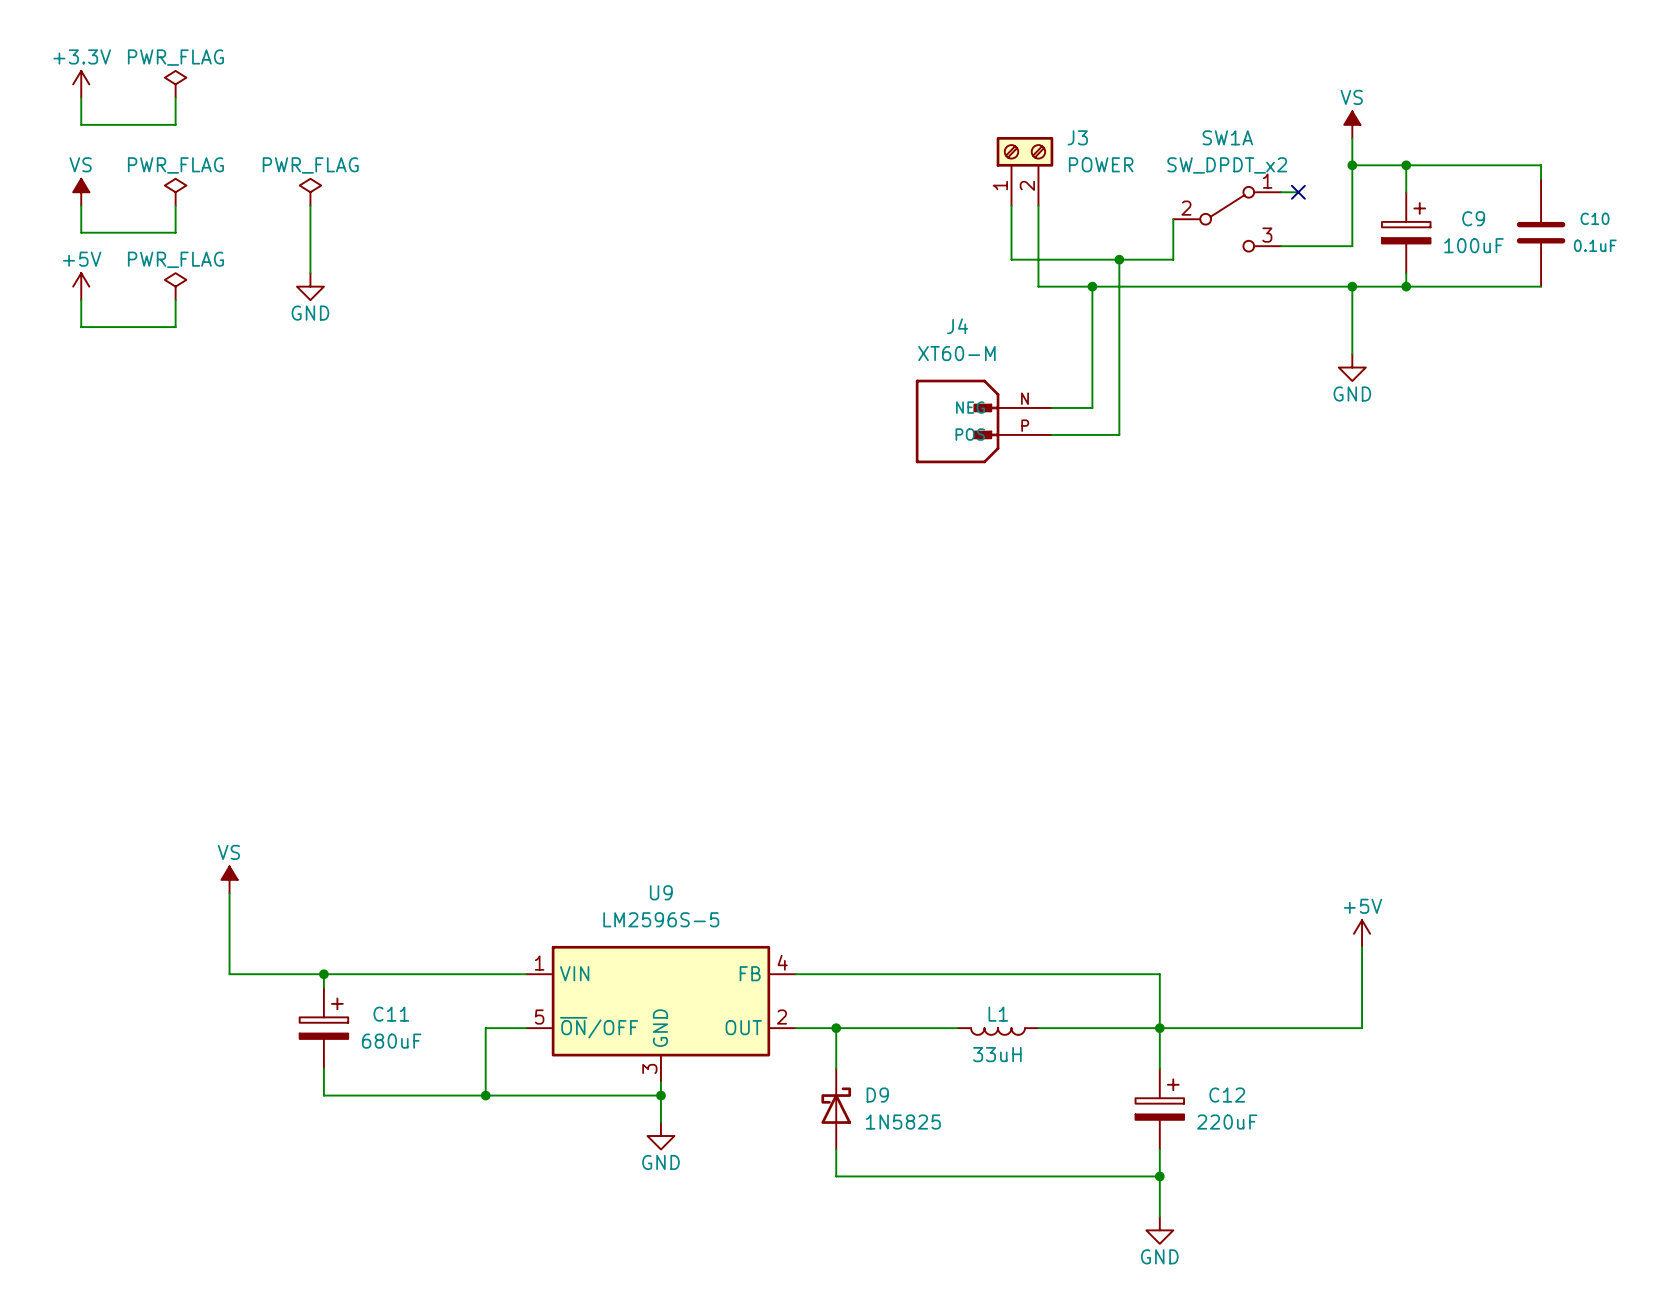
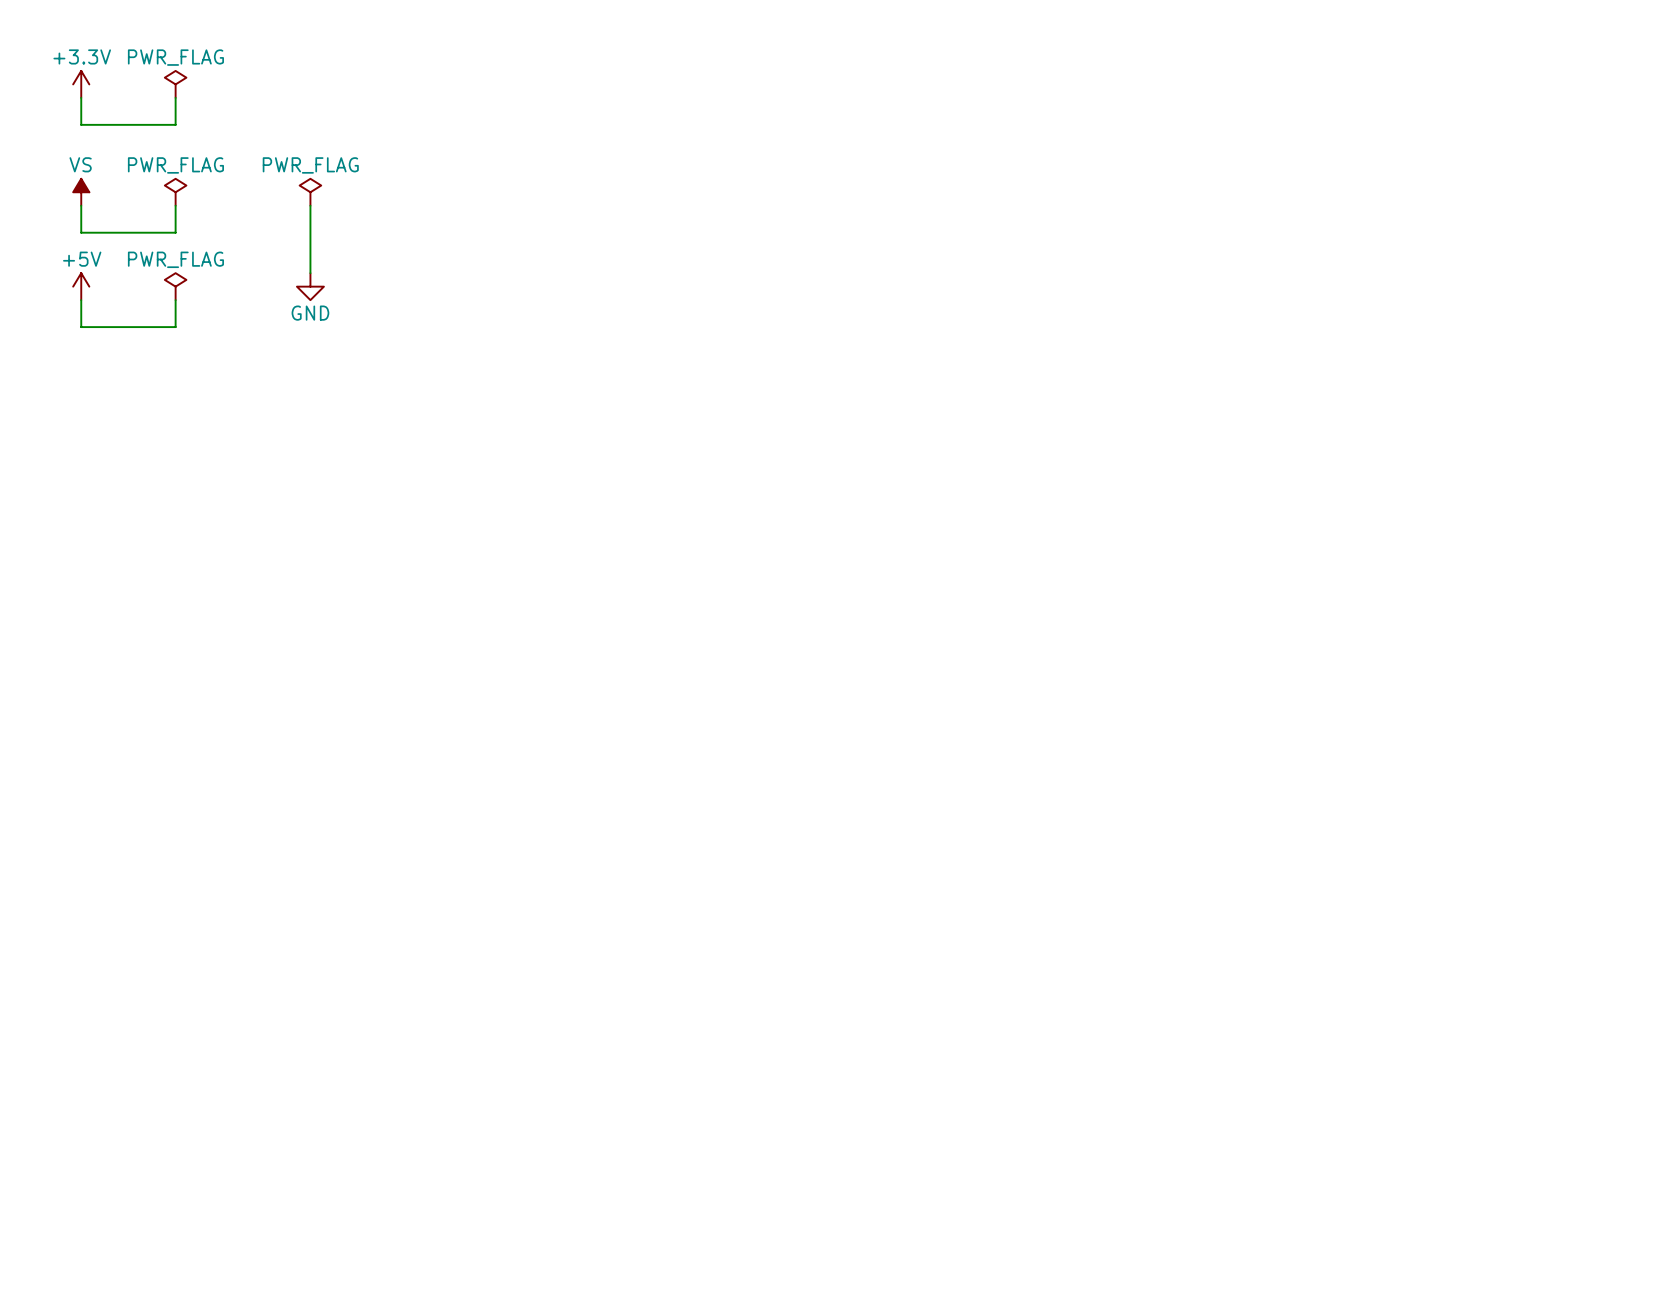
power symbol: VS (1352, 124) -> none
wire: (1352, 138) (1352, 246) (1281, 246) -> none
wire: (1352, 165) (1541, 165) (1541, 178) -> none
junction: (1352, 165) -> none
wire: (1406, 165) (1406, 192) -> none
junction: (1406, 165) -> none
J3: POWER (1024, 171) -> none
wire: (1281, 192) (1298, 192) -> none
no-connect mark: (1298, 192) -> none
wire: (1011, 205) (1011, 259) (1173, 259) (1173, 219) -> none
wire: (1038, 205) (1038, 286) (1541, 286) -> none
SW1A: SW_DPDT_x2 (1227, 219) -> none
C9: 100uF (1406, 232) -> none
C10: 0.1uF (1541, 232) -> none
wire: (1119, 259) (1119, 434) (1051, 434) -> none
junction: (1119, 259) -> none
wire: (1406, 273) (1406, 286) -> none
wire: (1092, 286) (1092, 407) (1051, 407) -> none
junction: (1092, 286) -> none
wire: (1352, 286) (1352, 354) -> none
junction: (1352, 286) -> none
junction: (1406, 286) -> none
power symbol: GND (1352, 367) -> none
J4: XT60-M (983, 421) -> none
power symbol: VS (229, 879) -> none
wire: (229, 893) (229, 974) (526, 974) -> none
power symbol: +5V (1362, 933) -> none
wire: (1362, 947) (1362, 1028) (1038, 1028) -> none
wire: (323, 974) (323, 987) -> none
junction: (323, 974) -> none
wire: (795, 974) (1159, 974) (1159, 1068) -> none
U9: LM2596S-5 (660, 1013) -> none
C11: 680uF (323, 1028) -> none
wire: (526, 1028) (485, 1028) (485, 1095) -> none
wire: (795, 1028) (957, 1028) -> none
wire: (836, 1028) (836, 1068) -> none
junction: (836, 1028) -> none
junction: (1159, 1028) -> none
L1: 33uH (998, 1031) -> none
wire: (323, 1068) (323, 1095) (660, 1095) -> none
wire: (660, 1082) (660, 1122) -> none
junction: (485, 1095) -> none
junction: (660, 1095) -> none
D9: 1N5825 (836, 1109) -> none
C12: 220uF (1159, 1109) -> none
power symbol: GND (660, 1136) -> none
wire: (836, 1149) (836, 1176) (1159, 1176) -> none
wire: (1159, 1149) (1159, 1216) -> none
junction: (1159, 1176) -> none
power symbol: GND (1159, 1230) -> none

